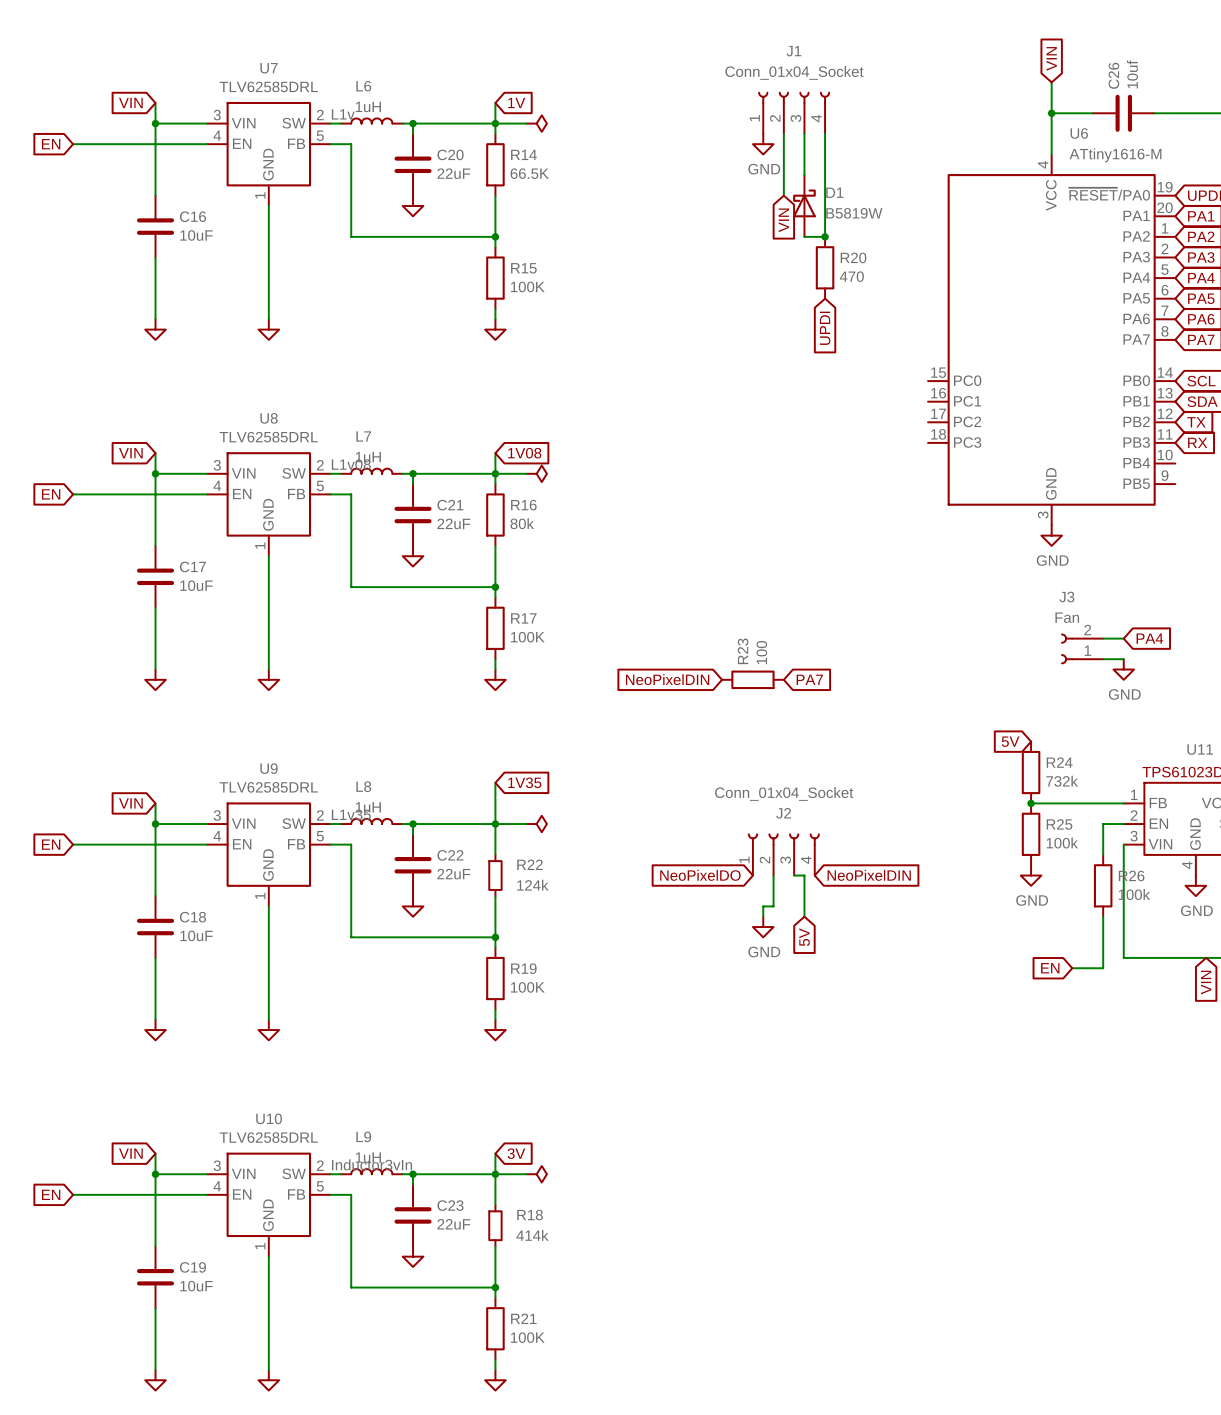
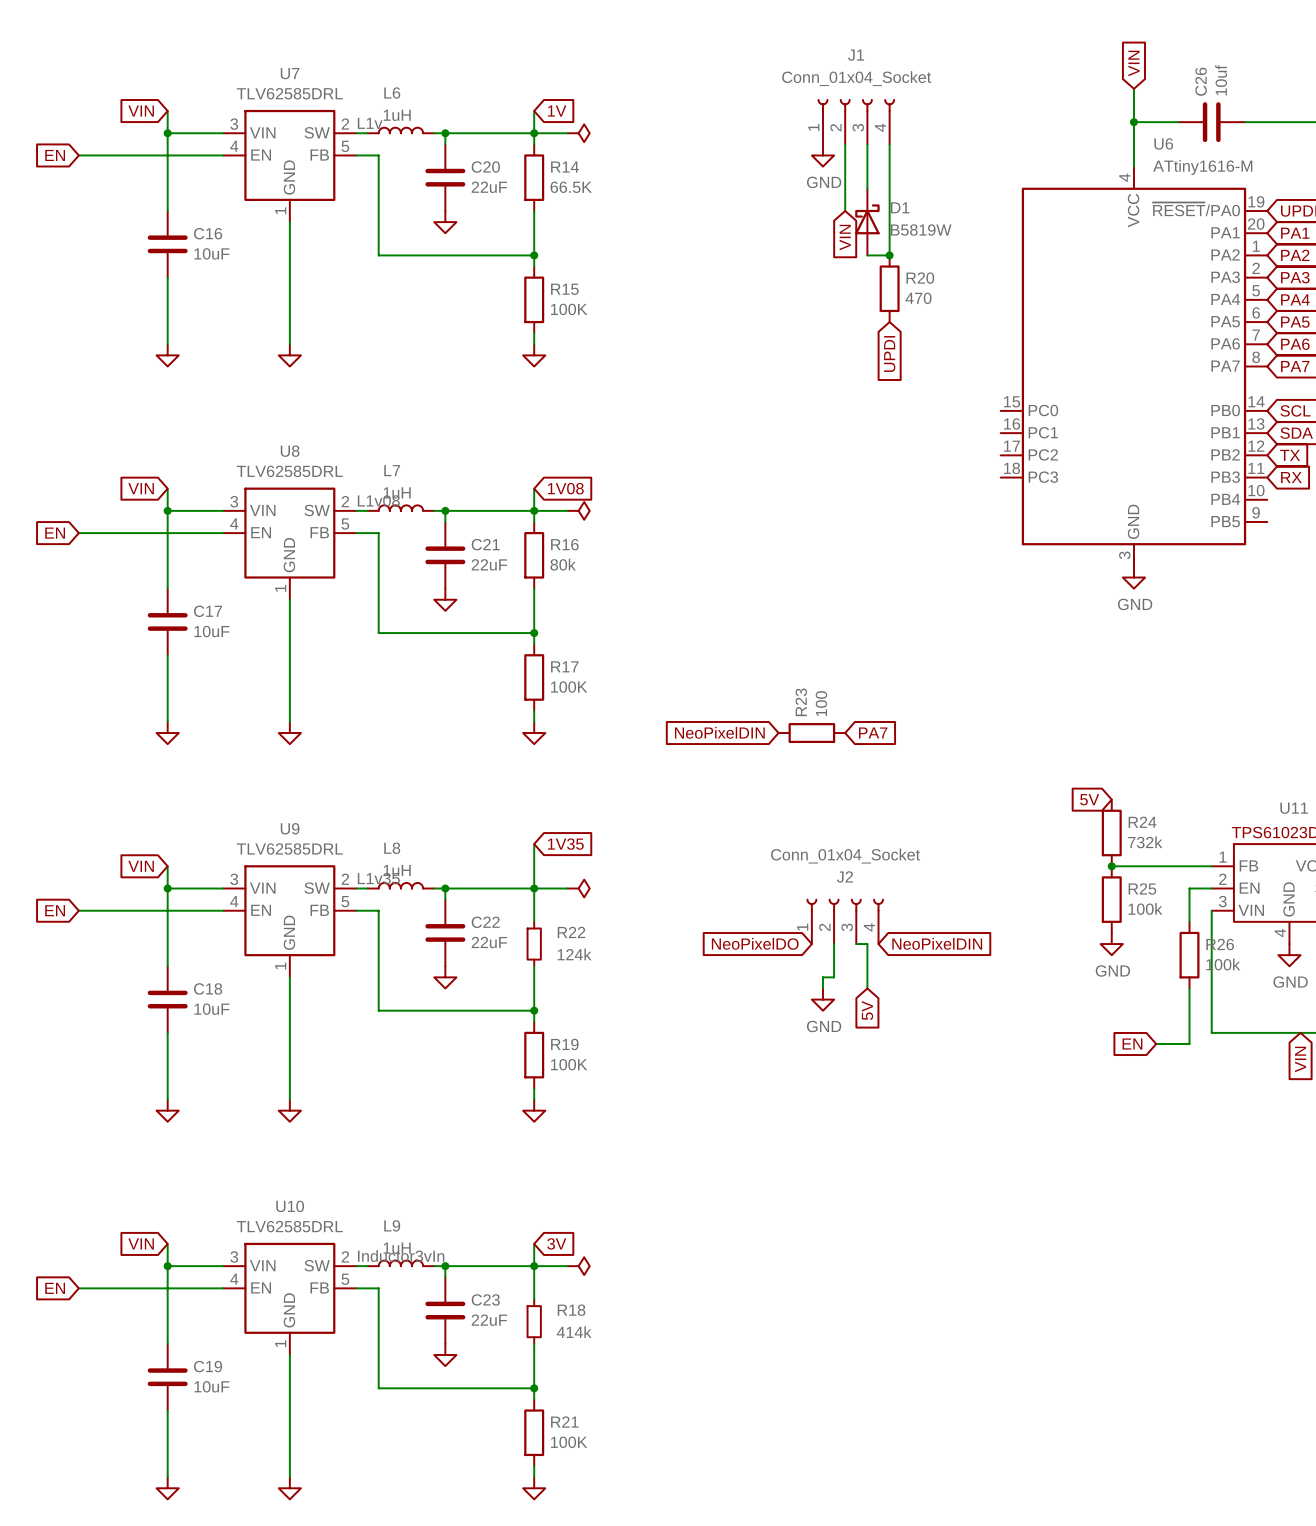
wire: (1103, 638) (1123, 638) -> none
global label: PA4 (1149, 638) -> none
J3: Fan (1082, 648) -> none
wire: (1103, 659) (1123, 659) -> none
power symbol: GND (1123, 669) -> none

